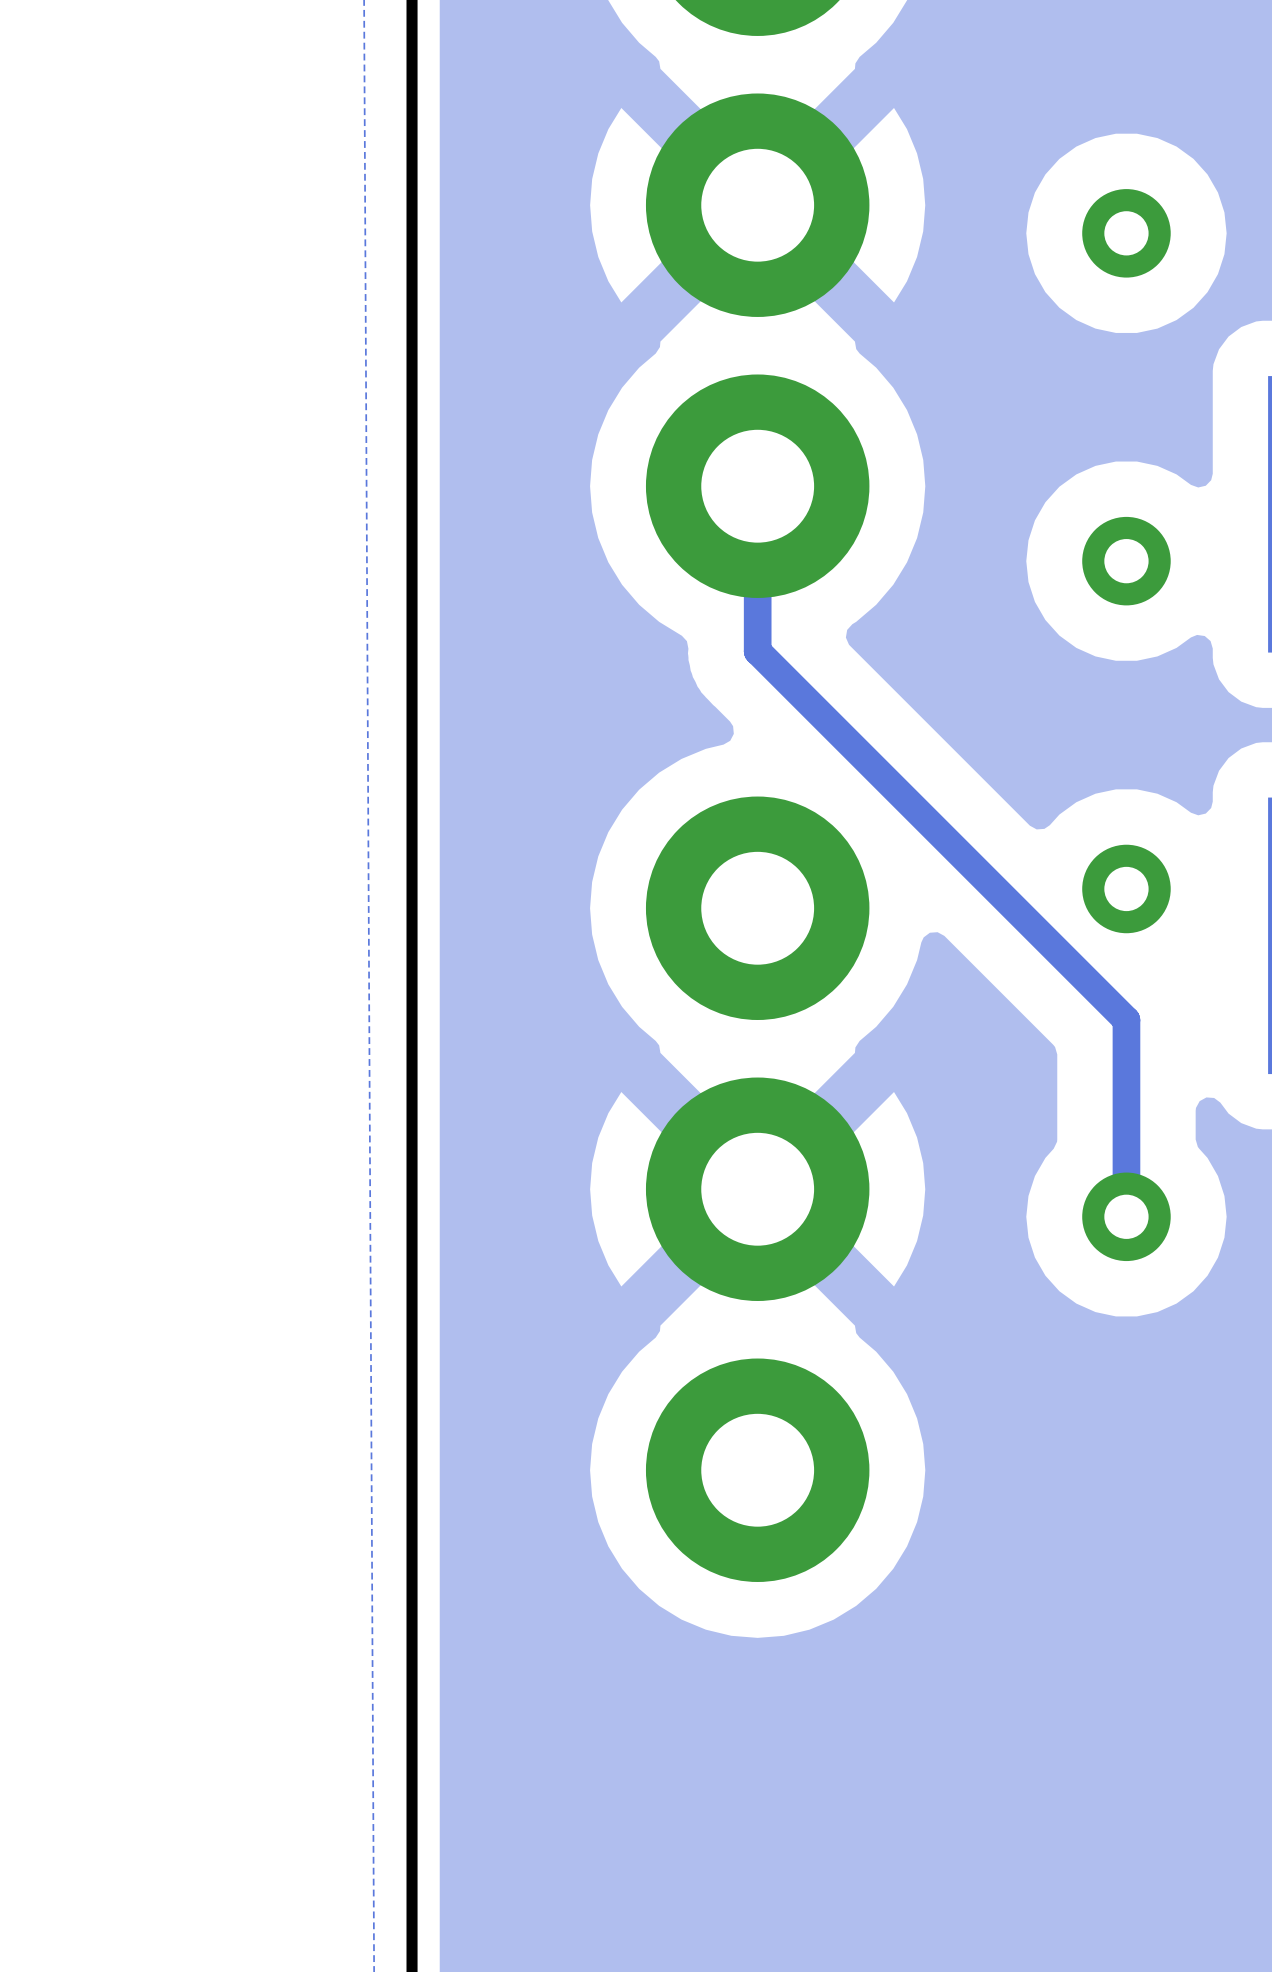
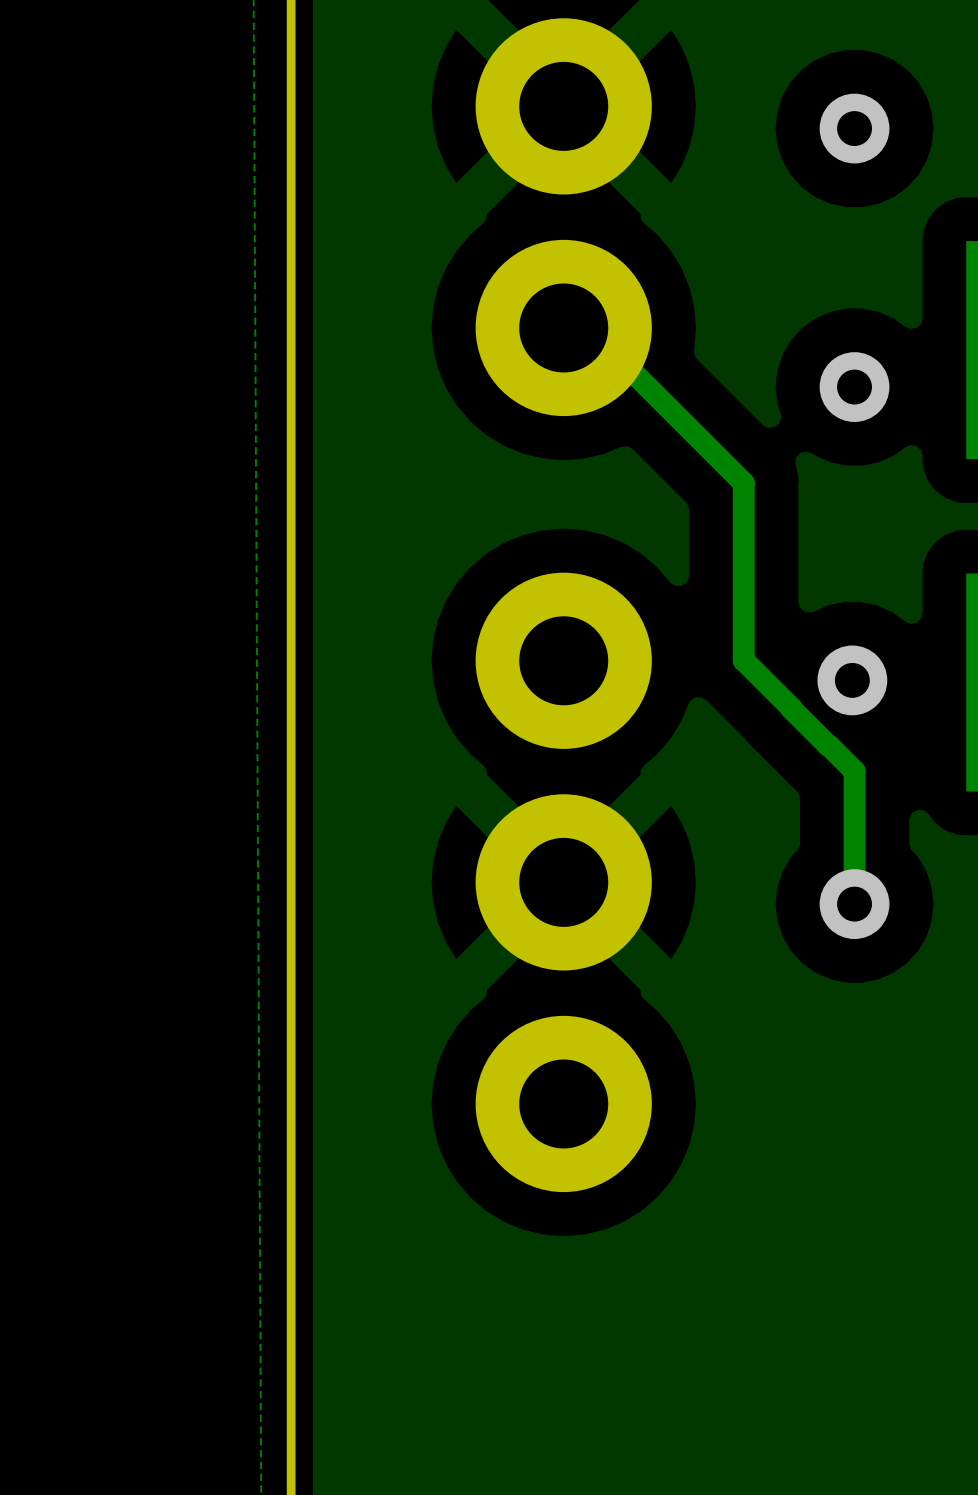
track: (757, 597) (757, 486) (757, 651) (1126, 1020) (1126, 1048) -> (563, 327) (588, 327) (743, 483) (743, 660) (854, 771)
via position: (1126, 888) -> (852, 680)

